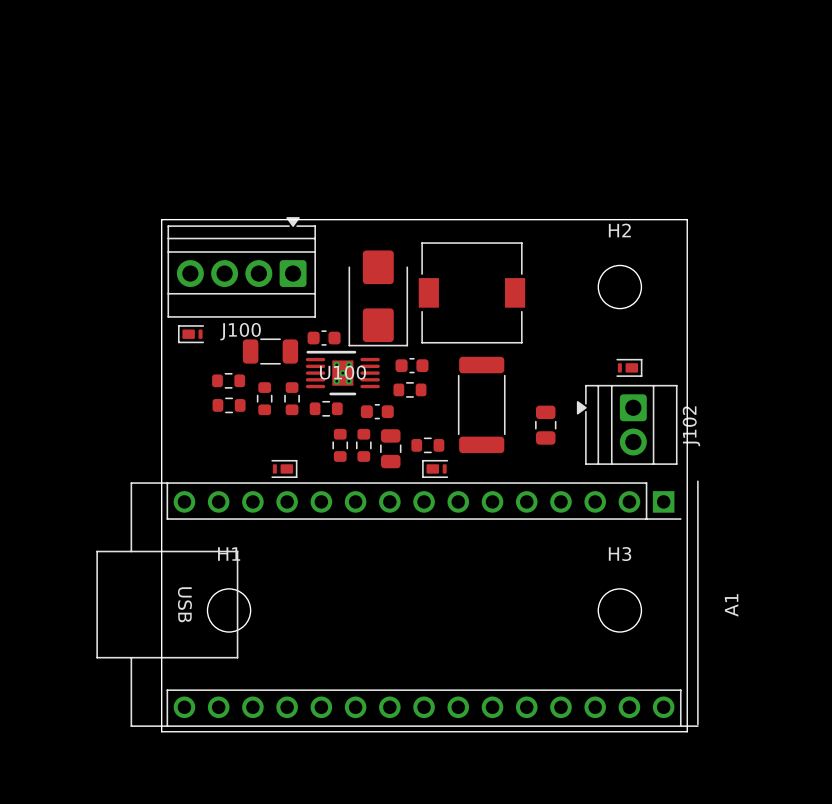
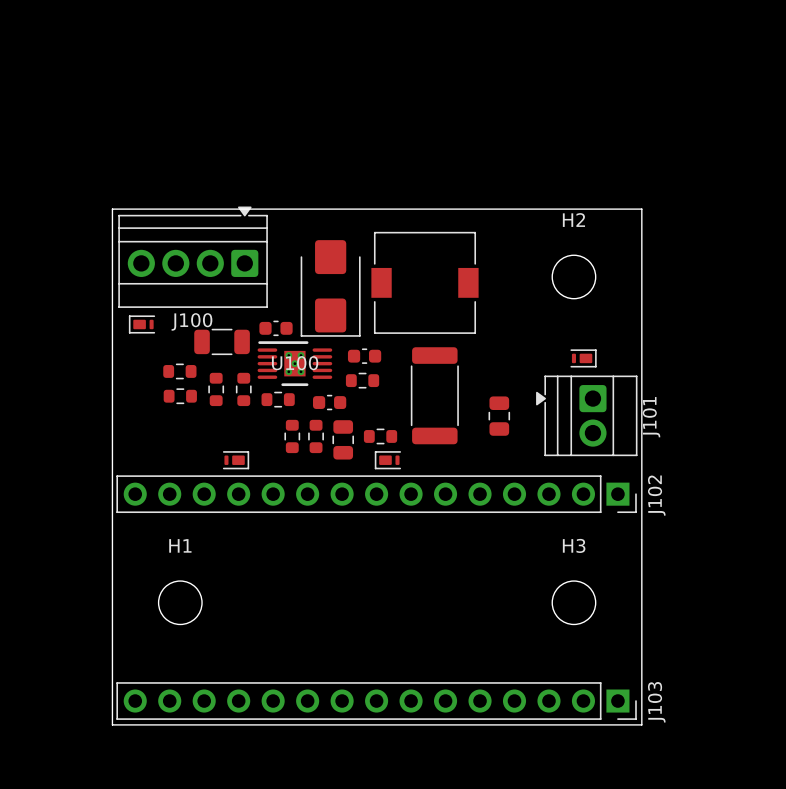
J102 footprint: [576, 384, 678, 465] -> [116, 475, 637, 514]
J101: none -> (586, 415)
J102 name position: J102 (691, 426) -> J102 (656, 495)
A1: (397, 603) -> none
J103: none -> (376, 701)

